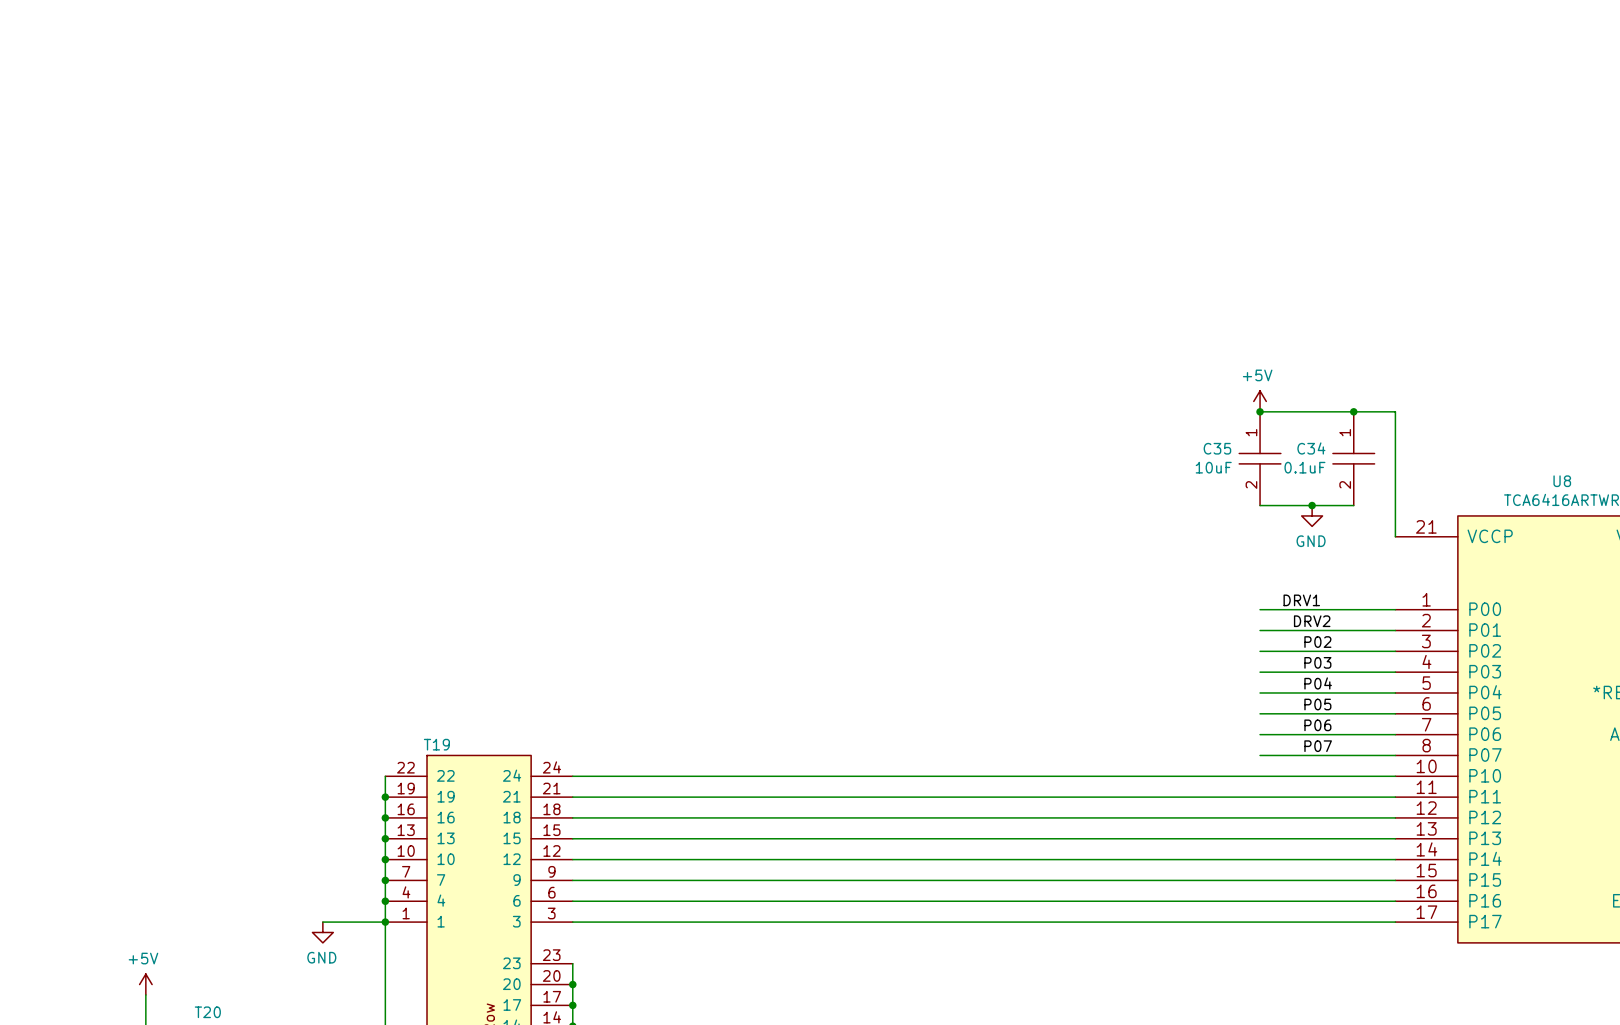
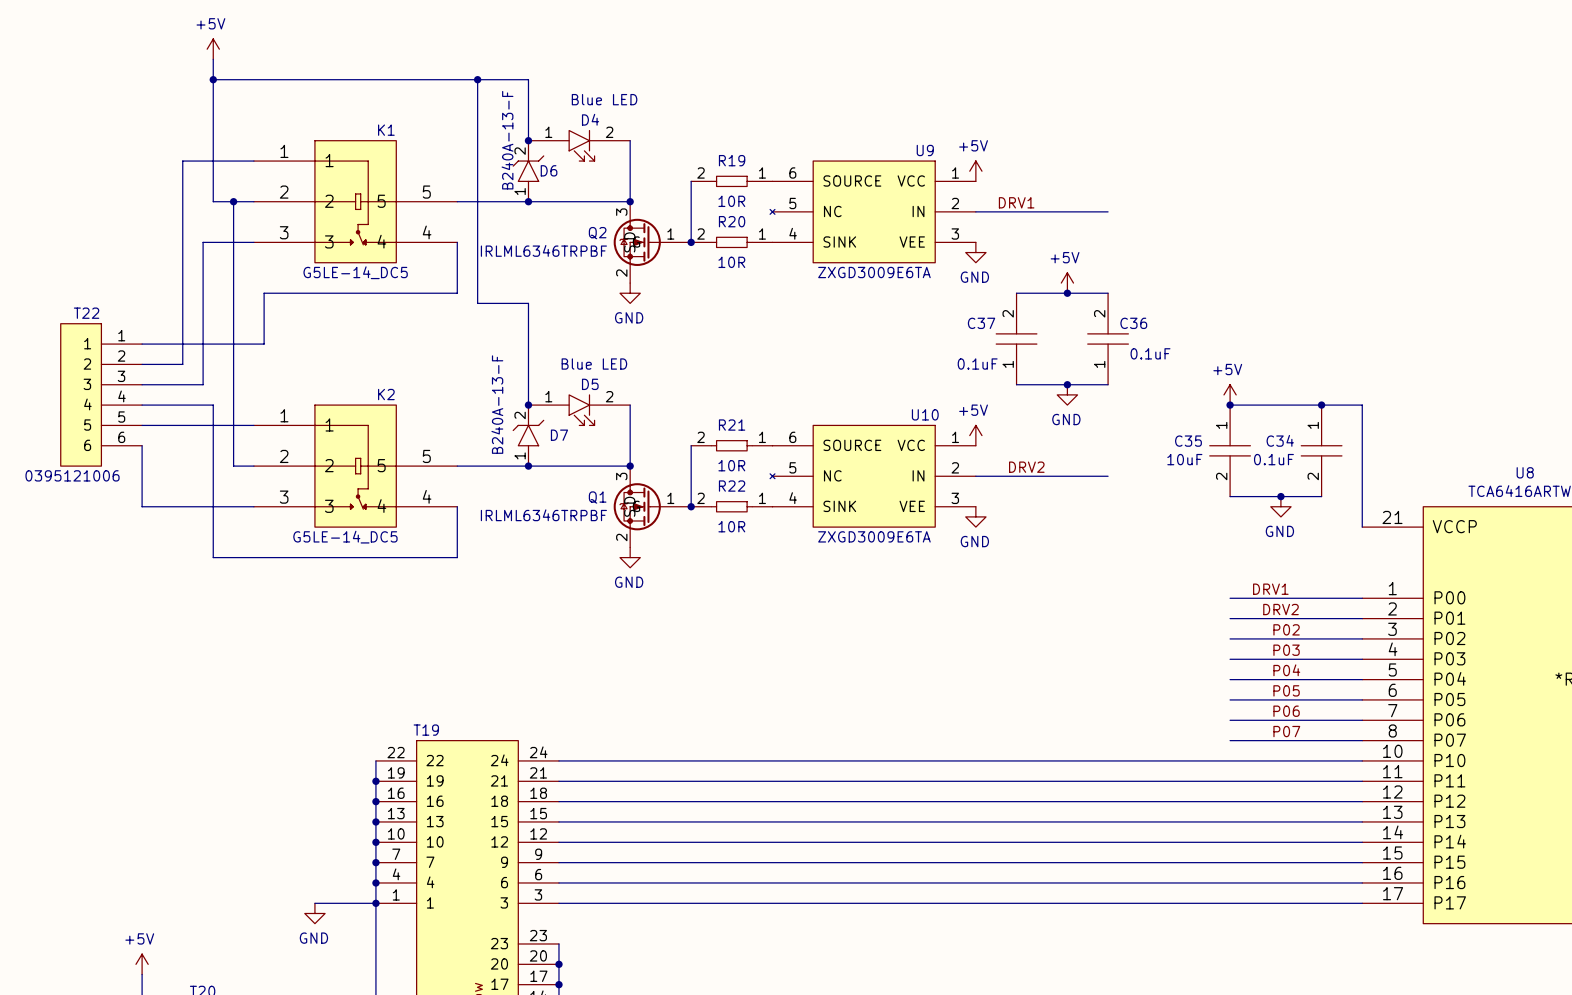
power symbol: none -> +5V (213, 49)
wire: none -> (213, 59) (213, 201) (253, 201)
wire: none -> (213, 79) (528, 79) (528, 140)
junction: none -> (213, 79)
wire: none -> (477, 79) (477, 303) (528, 303) (528, 405)
junction: none -> (477, 79)
junction: none -> (528, 140)
wire: none -> (630, 140) (630, 201) (457, 201)
D4: none -> (579, 145)
wire: none -> (253, 161) (182, 161) (182, 364) (142, 364)
D6: none -> (528, 171)
power symbol: none -> +5V (975, 171)
wire: none -> (691, 181) (691, 242)
R19: none -> (731, 181)
wire: none -> (233, 201) (233, 466) (253, 466)
junction: none -> (233, 201)
K1: none -> G5LE-14_DC5 (355, 201)
junction: none -> (528, 201)
junction: none -> (630, 201)
label: none -> DRV1 (1016, 202)
U9: none -> (872, 211)
wire: none -> (975, 211) (1108, 211)
wire: none -> (253, 242) (203, 242) (203, 384) (142, 384)
wire: none -> (457, 242) (457, 293) (264, 293) (264, 344) (142, 344)
Q2: none -> (652, 242)
junction: none -> (691, 242)
R20: none -> (731, 242)
power symbol: none -> GND (975, 252)
power symbol: none -> +5V (1067, 283)
power symbol: none -> GND (630, 293)
wire: none -> (1016, 293) (1108, 293)
junction: none -> (1067, 293)
C37: none -> (1016, 338)
C36: none -> (1108, 338)
wire: none -> (1016, 384) (1108, 384)
junction: none -> (1067, 384)
T22: none -> 0395121006 (101, 394)
power symbol: none -> GND (1067, 394)
wire: none -> (142, 405) (213, 405) (213, 557) (457, 557) (457, 506)
junction: none -> (528, 405)
wire: none -> (630, 405) (630, 466) (457, 466)
D5: none -> (579, 410)
wire: none -> (142, 425) (253, 425)
D7: none -> (528, 435)
power symbol: none -> +5V (975, 435)
wire: none -> (142, 445) (142, 506) (253, 506)
wire: none -> (691, 445) (691, 506)
R21: none -> (731, 445)
K2: none -> G5LE-14_DC5 (355, 466)
junction: none -> (528, 466)
junction: none -> (630, 466)
label: none -> DRV2 (1026, 467)
U10: none -> (872, 476)
wire: none -> (975, 476) (1108, 476)
Q1: none -> (652, 506)
junction: none -> (691, 506)
R22: none -> (731, 506)
power symbol: none -> GND (975, 516)
power symbol: none -> GND (630, 557)

